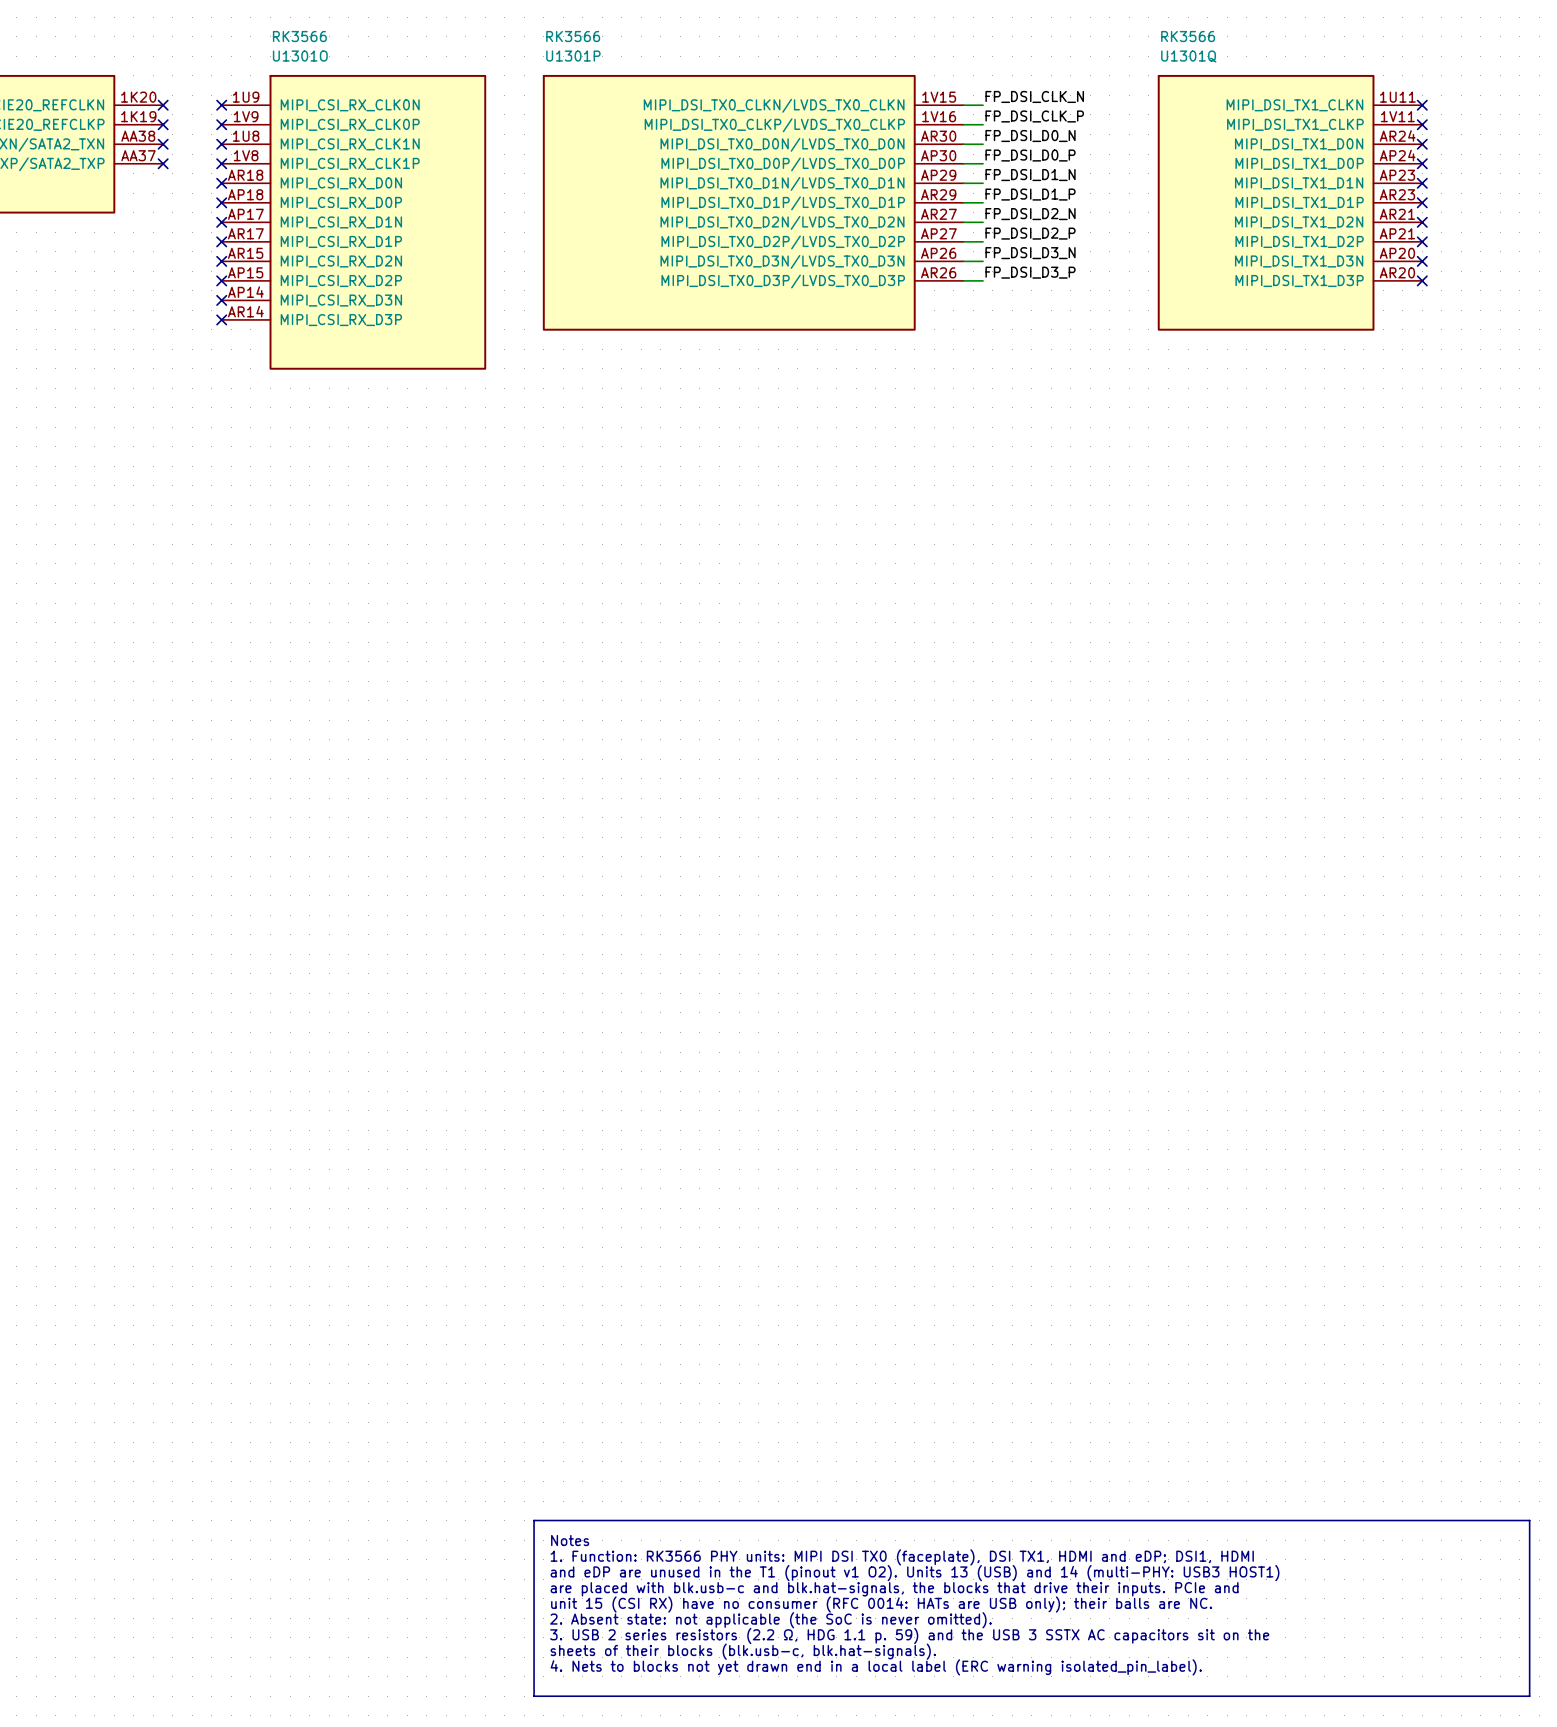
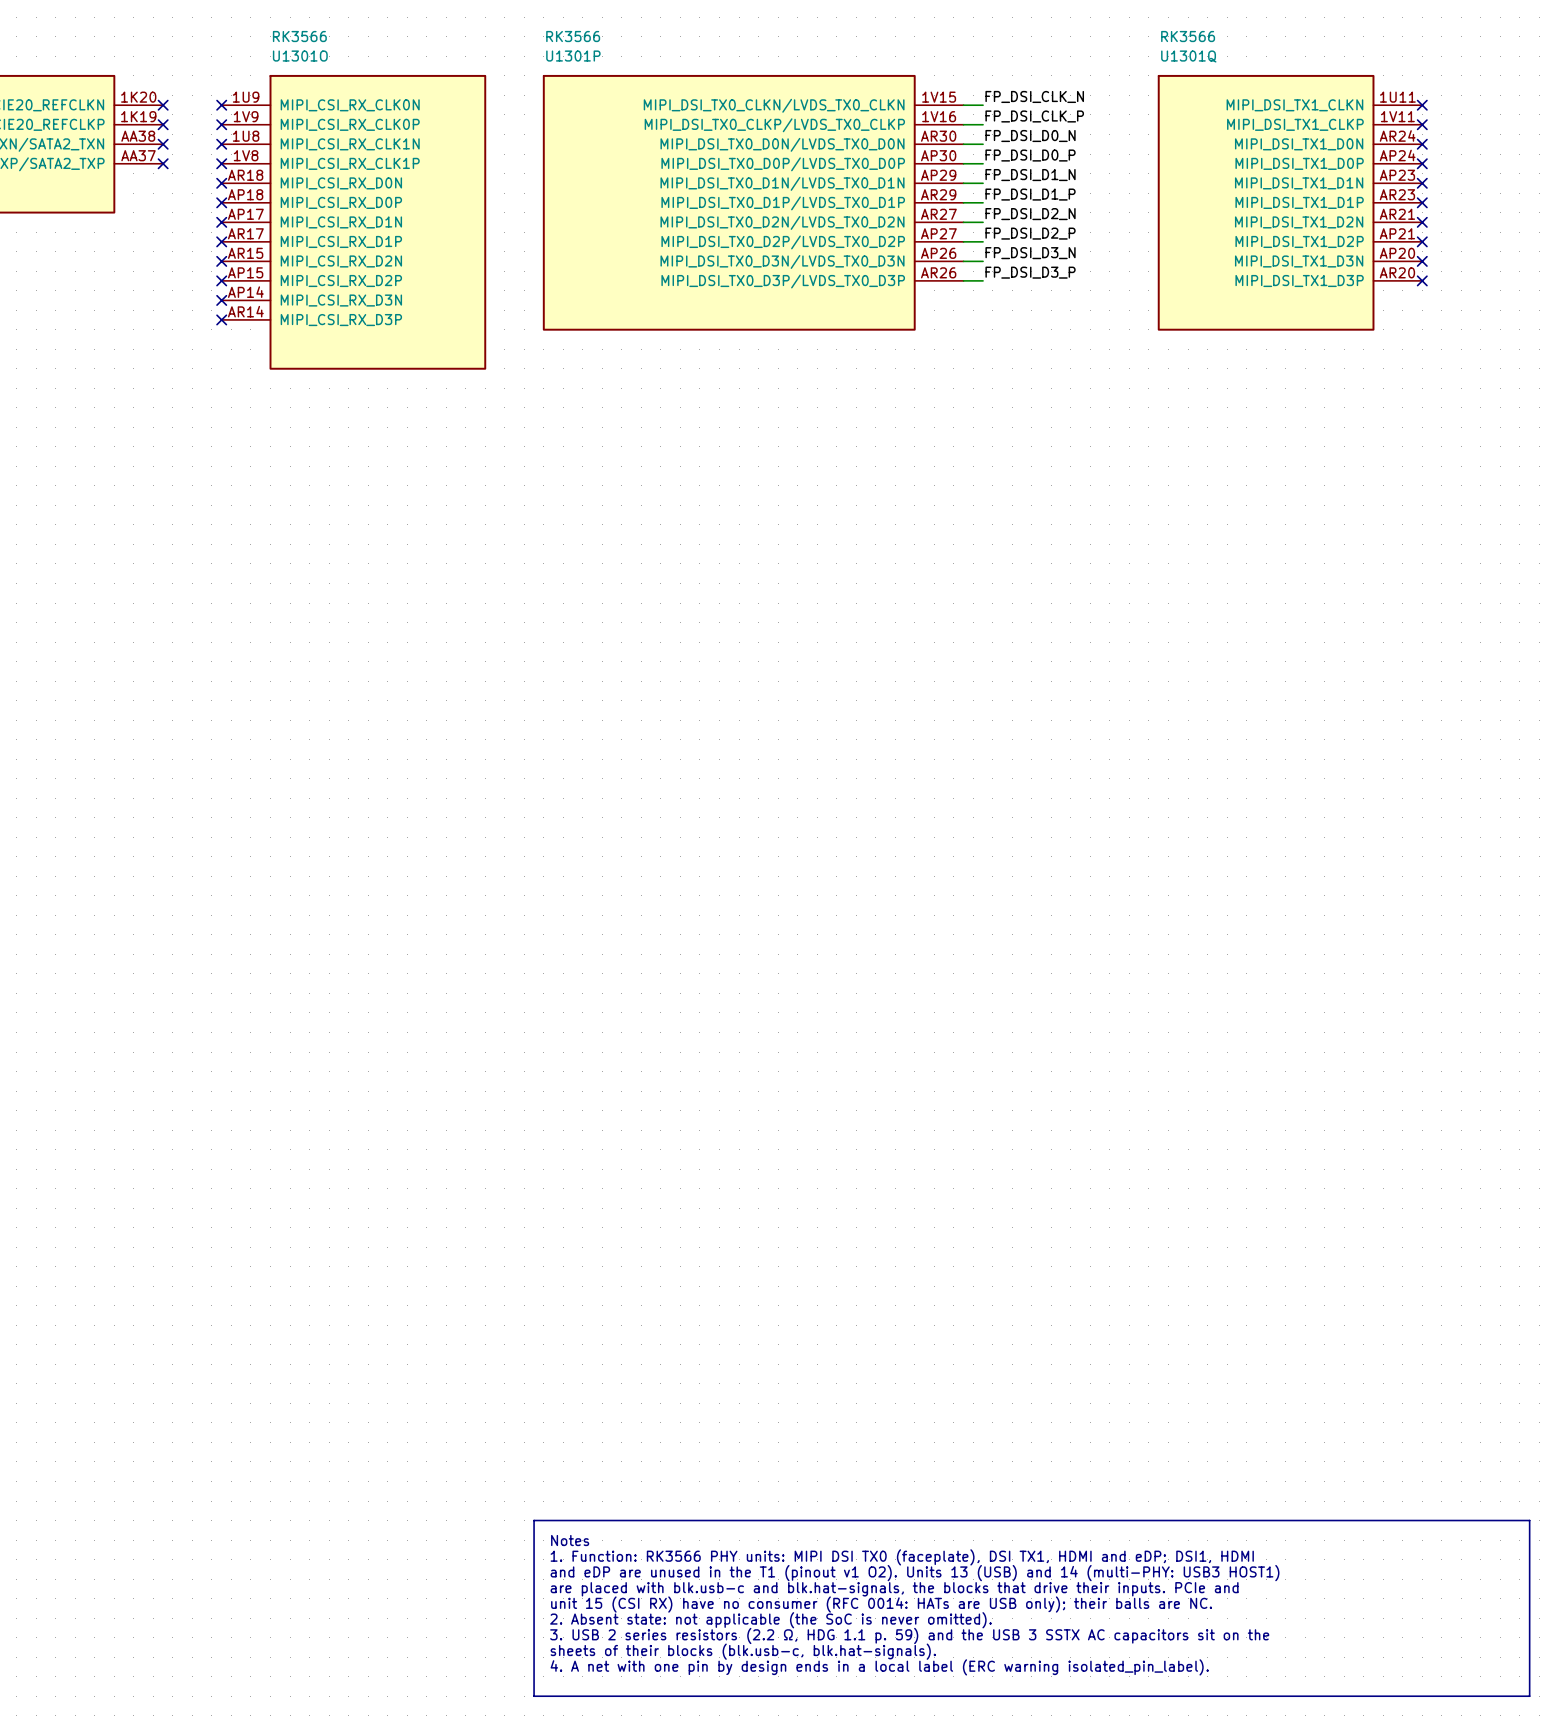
text: 4. Nets to blocks not yet drawn end in a local label (ERC warning isolated_pin_label). (876, 1667) -> 4. A net with one pin by design ends in a local label (ERC warning isolated_pin_label). (879, 1667)

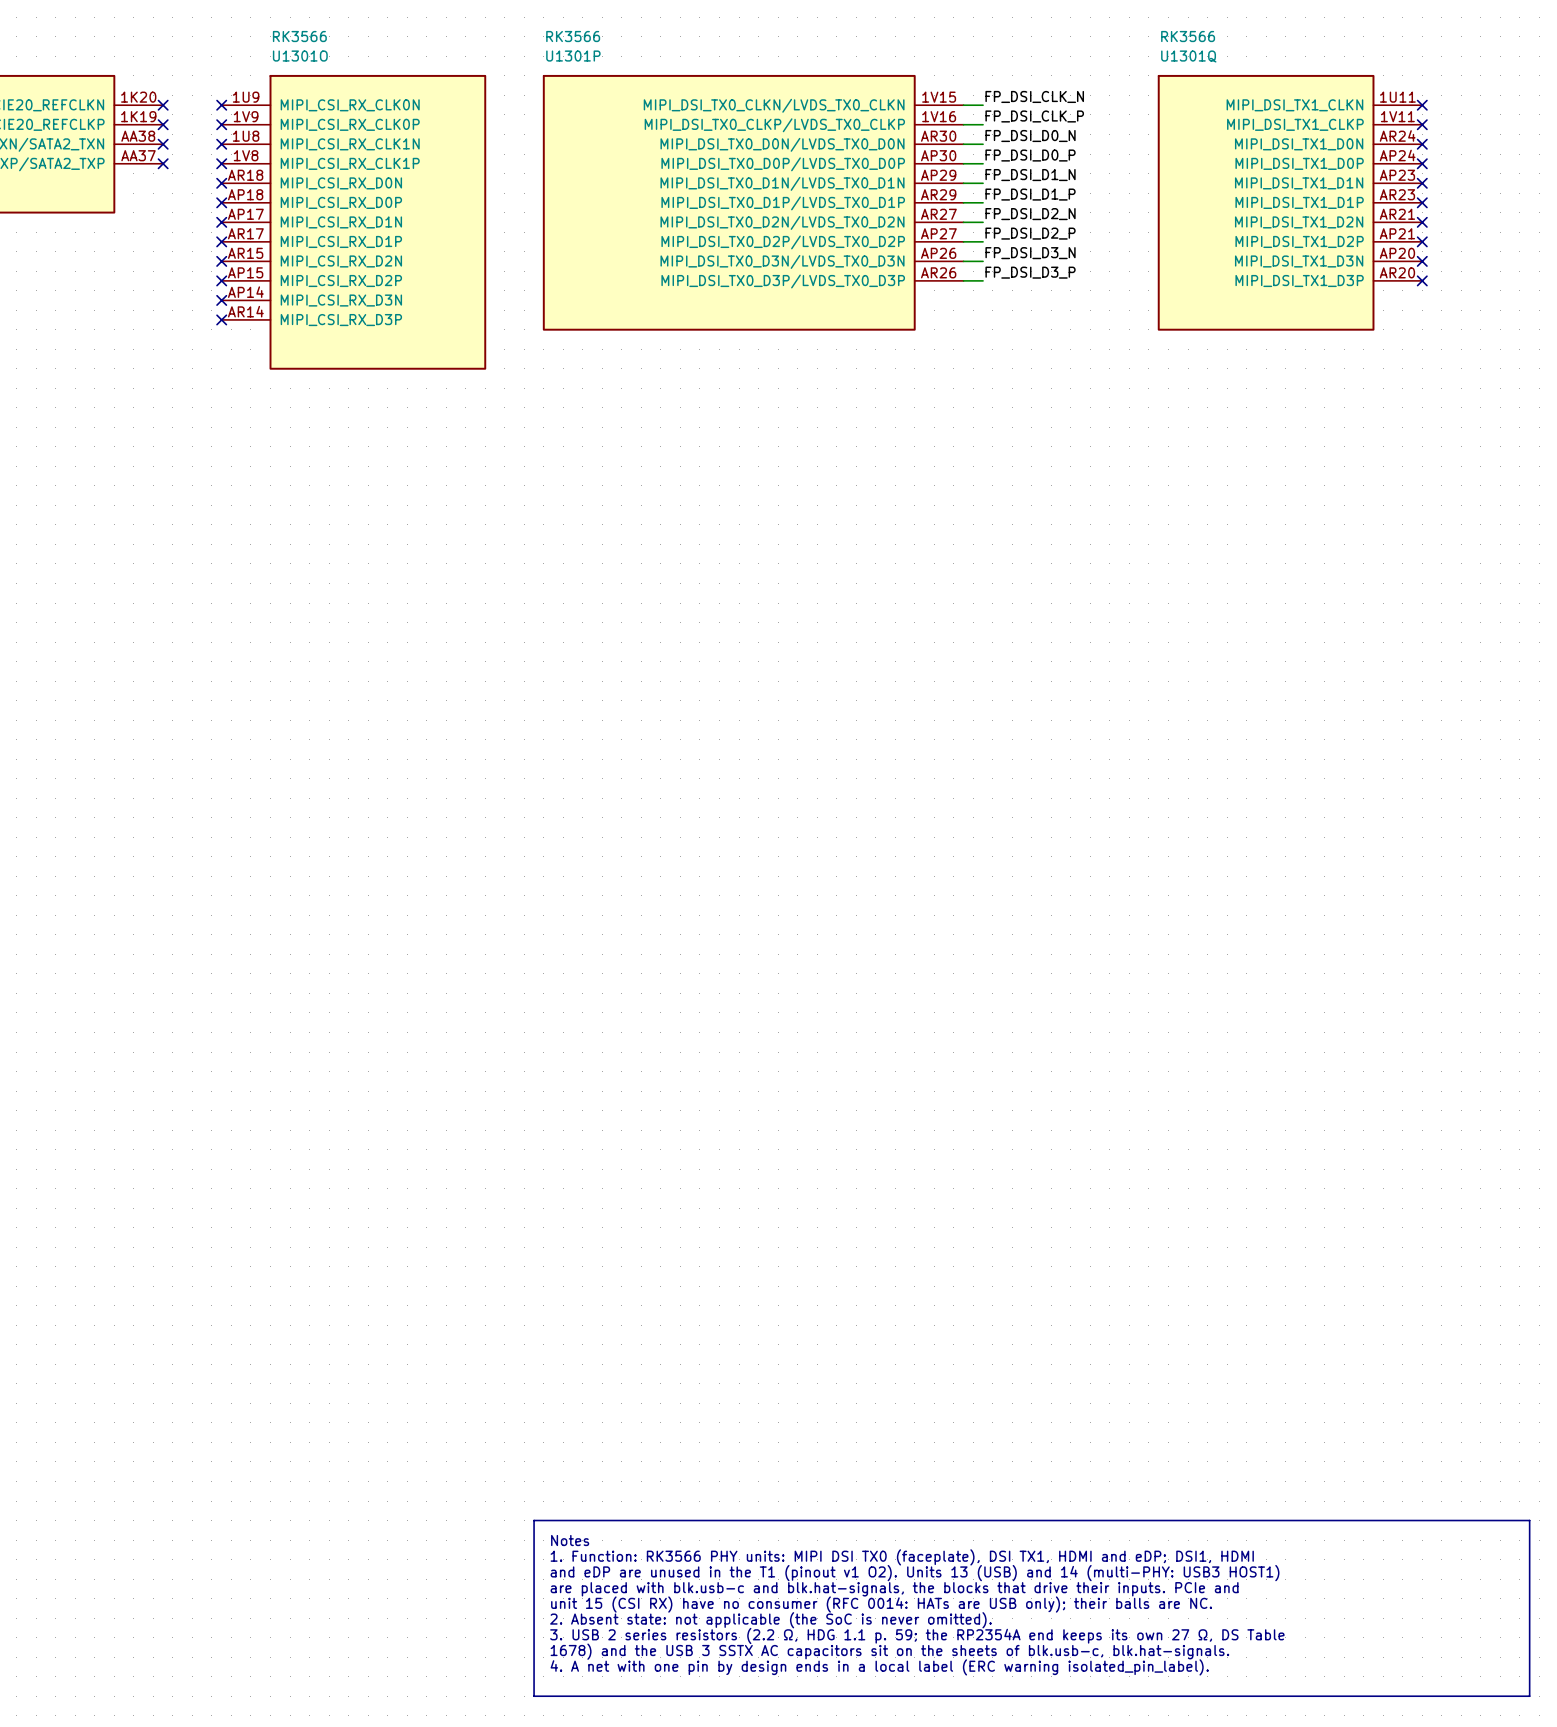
text: 3. USB 2 series resistors (2.2 Ω, HDG 1.1 p. 59) and the USB 3 SSTX AC capacitors sit on the (909, 1635) -> 3. USB 2 series resistors (2.2 Ω, HDG 1.1 p. 59; the RP2354A end keeps its own 27 Ω, DS Table (917, 1635)
text: sheets of their blocks (blk.usb-c, blk.hat-signals). (743, 1651) -> 1678) and the USB 3 SSTX AC capacitors sit on the sheets of blk.usb-c, blk.hat-signals. (889, 1651)

